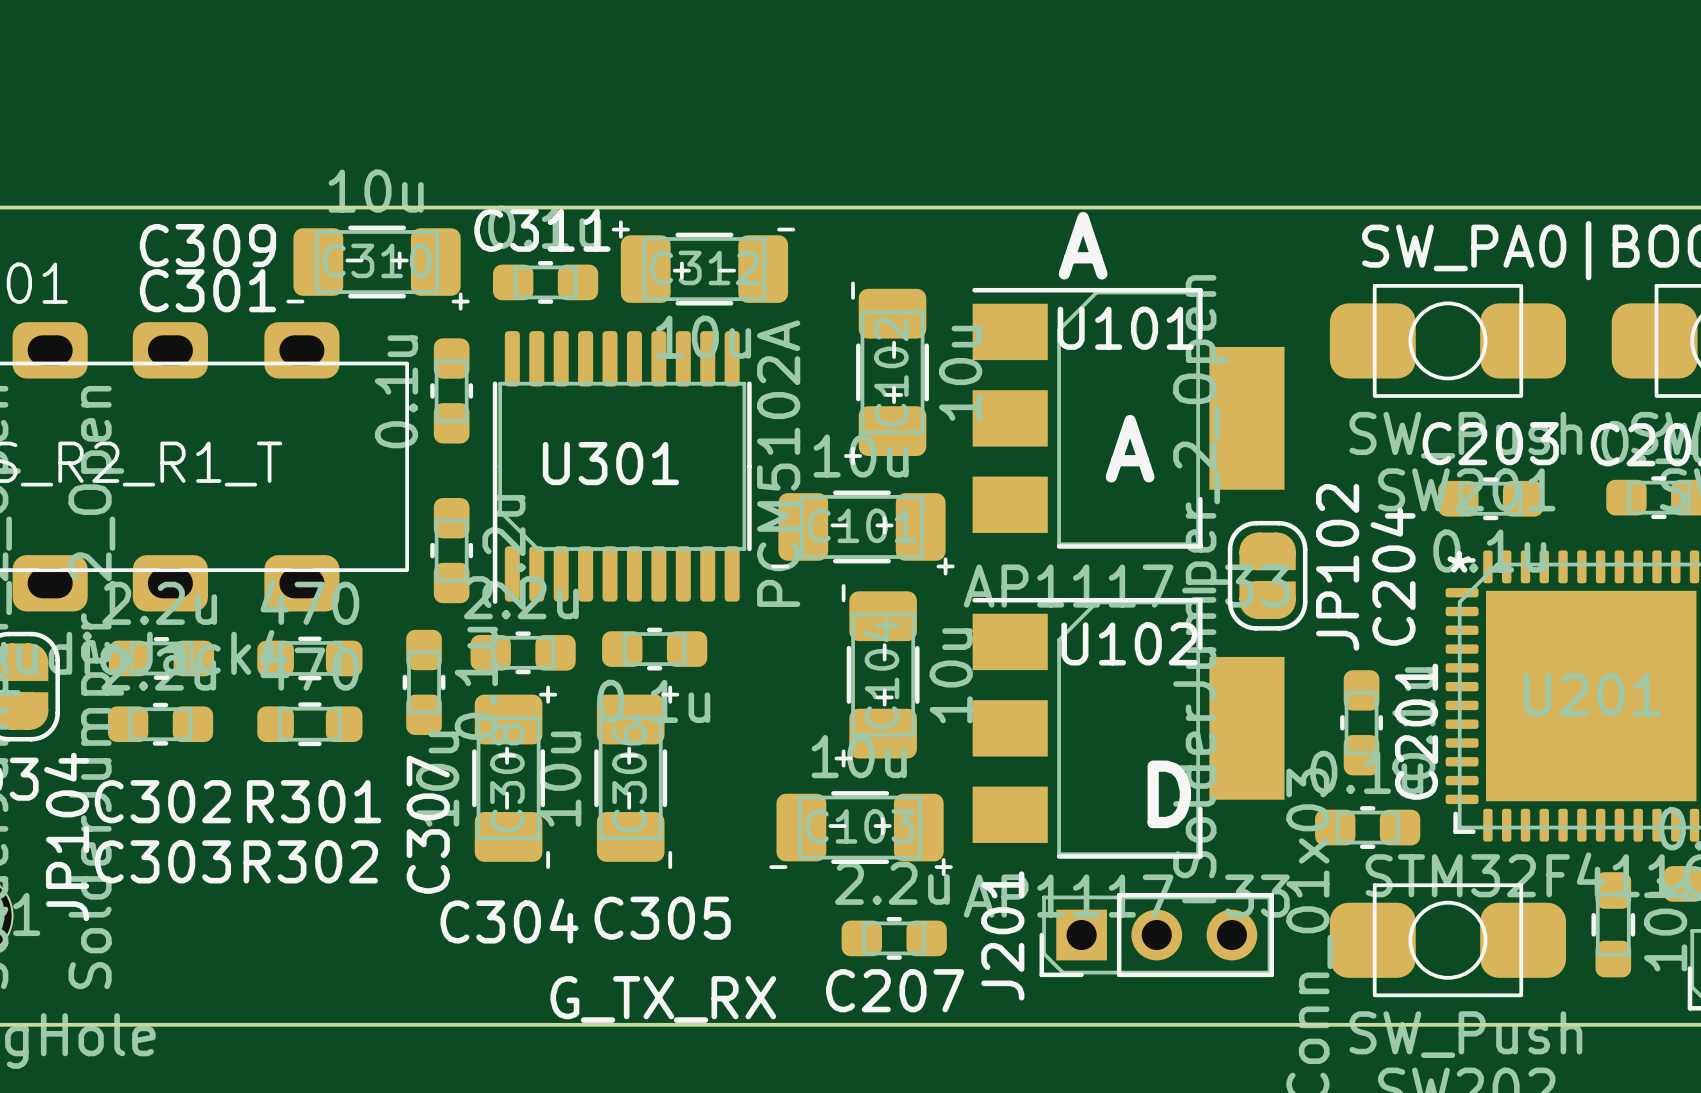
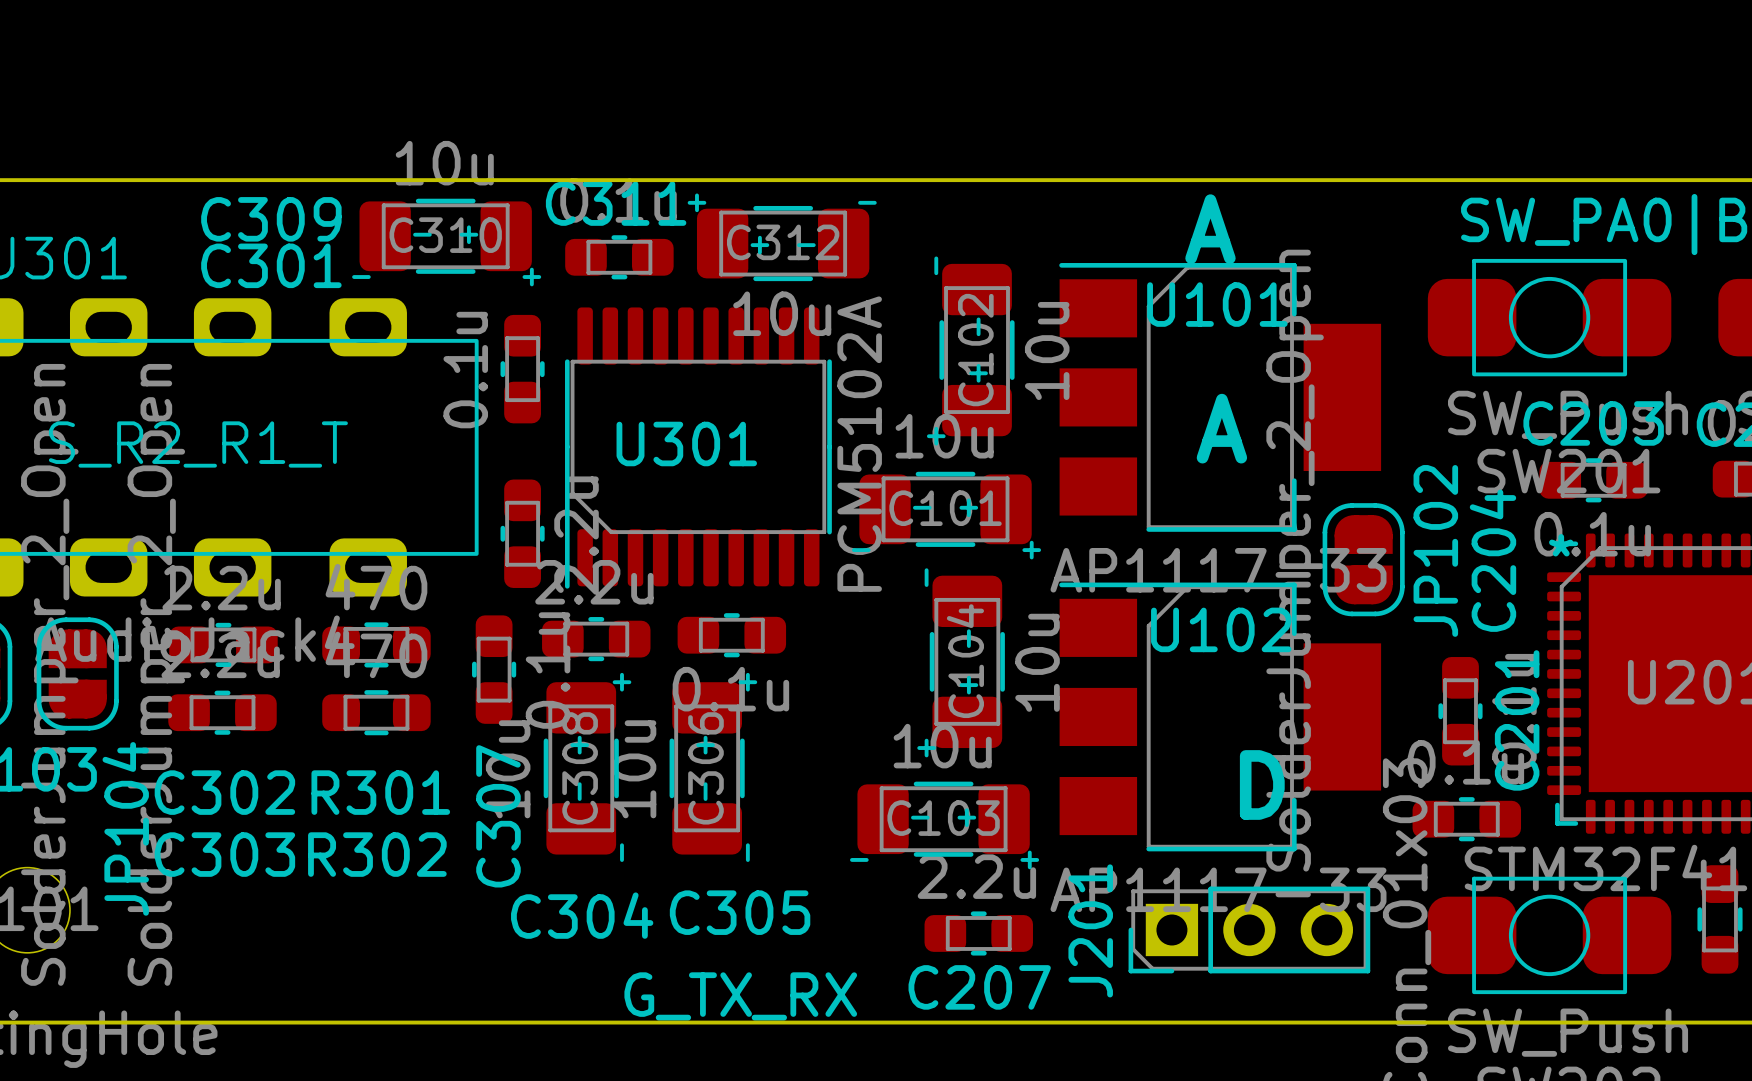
text position: A (1083, 245) -> A (1210, 229)

